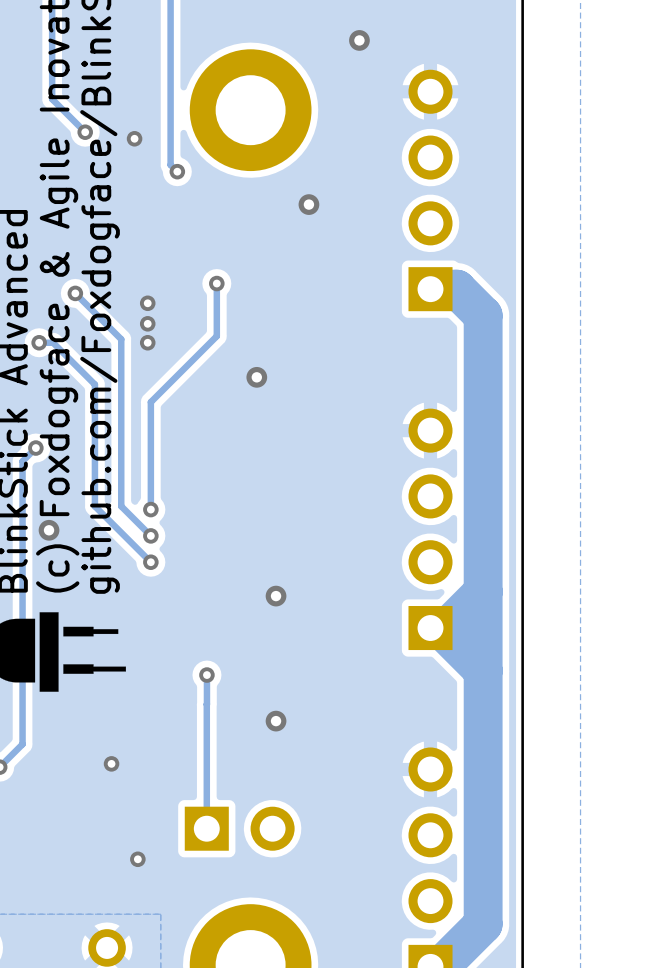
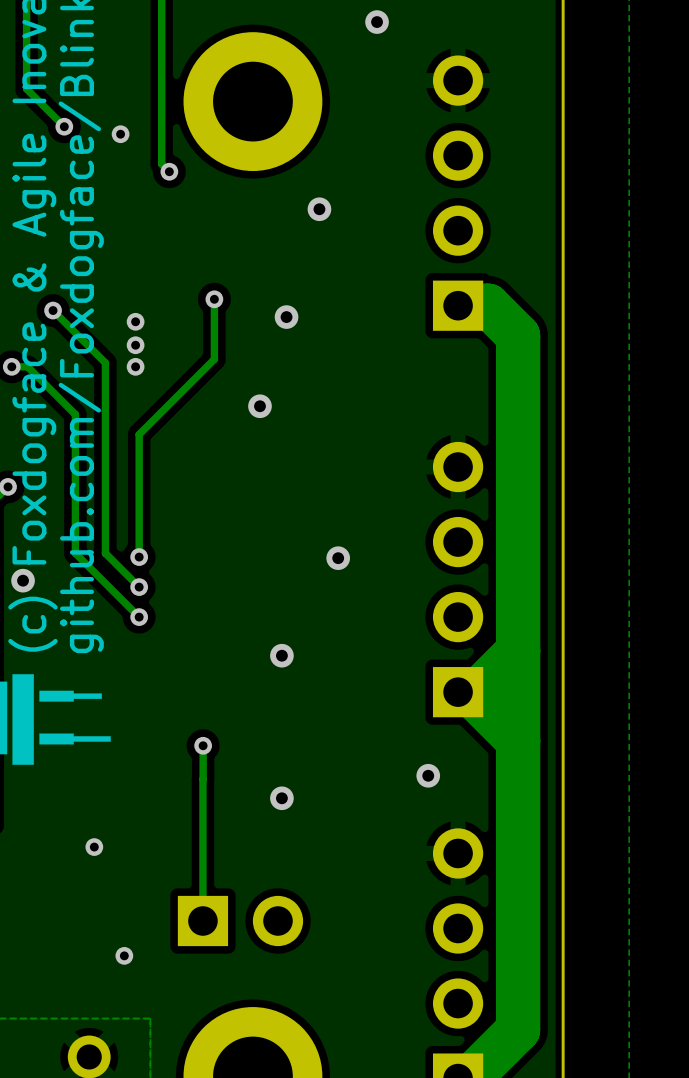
via: none -> (286, 317)
via: none -> (338, 558)
via: none -> (428, 775)

